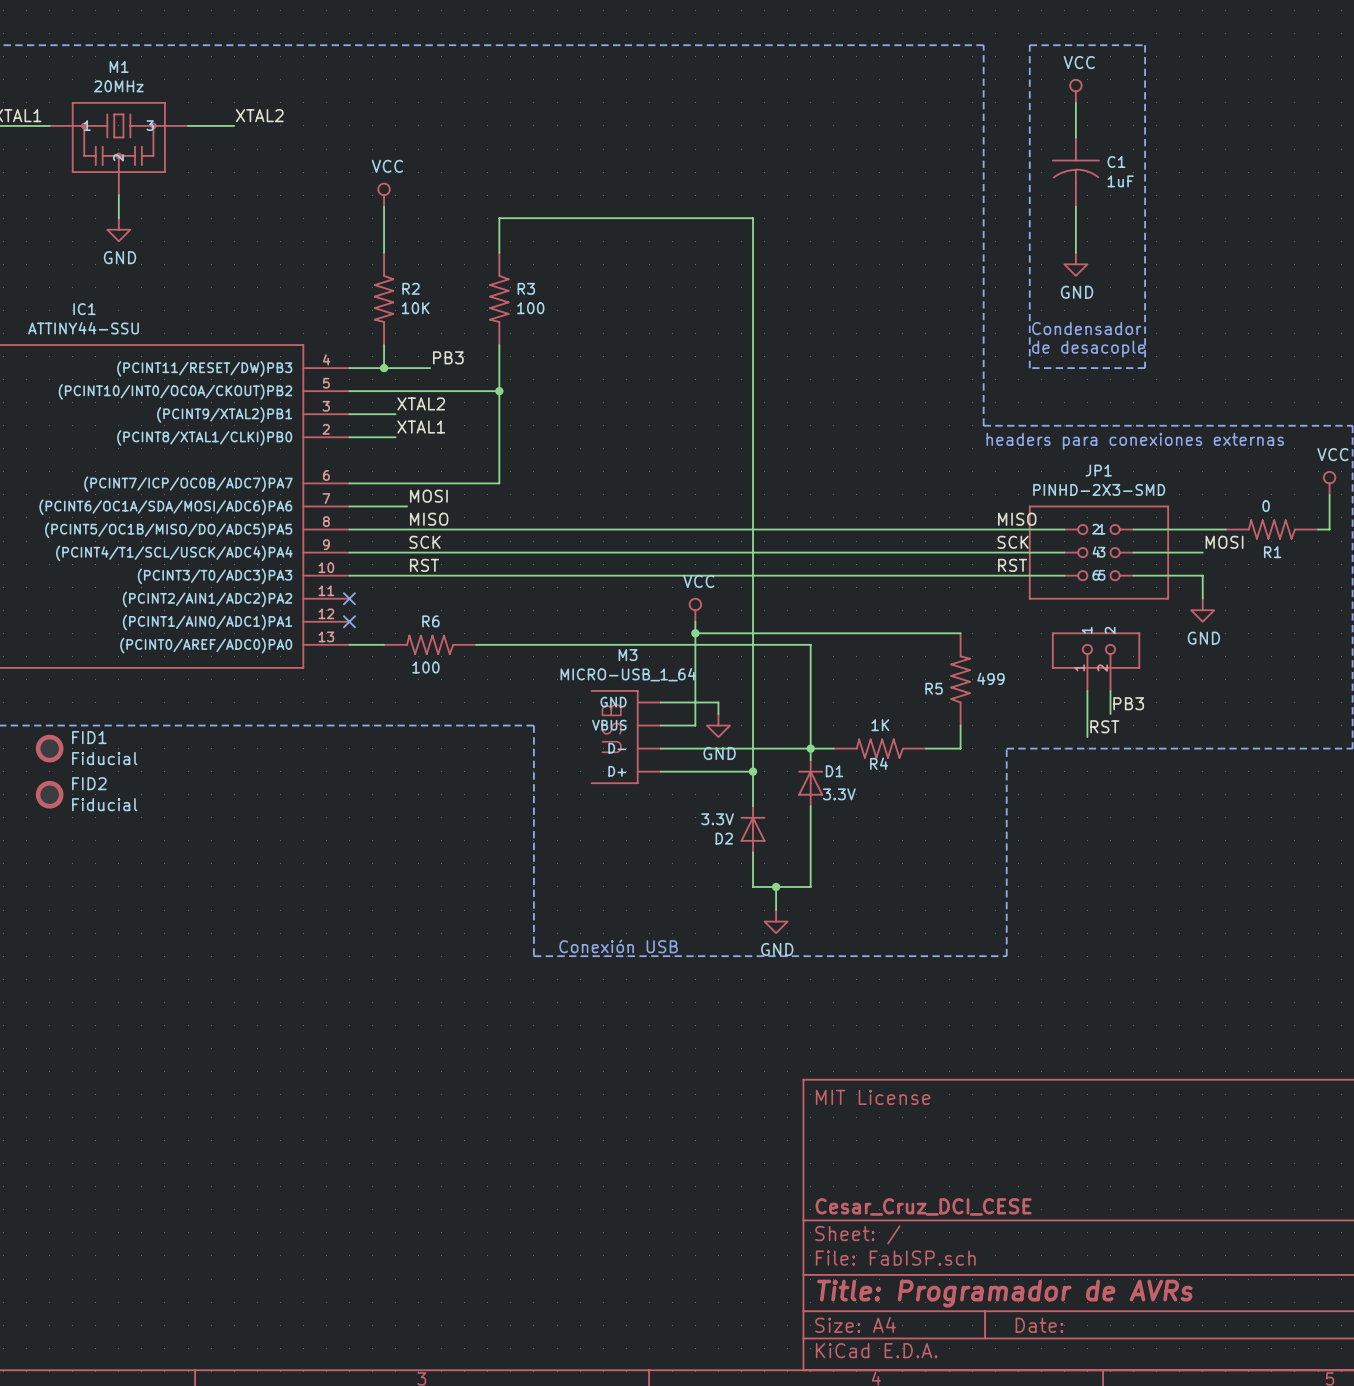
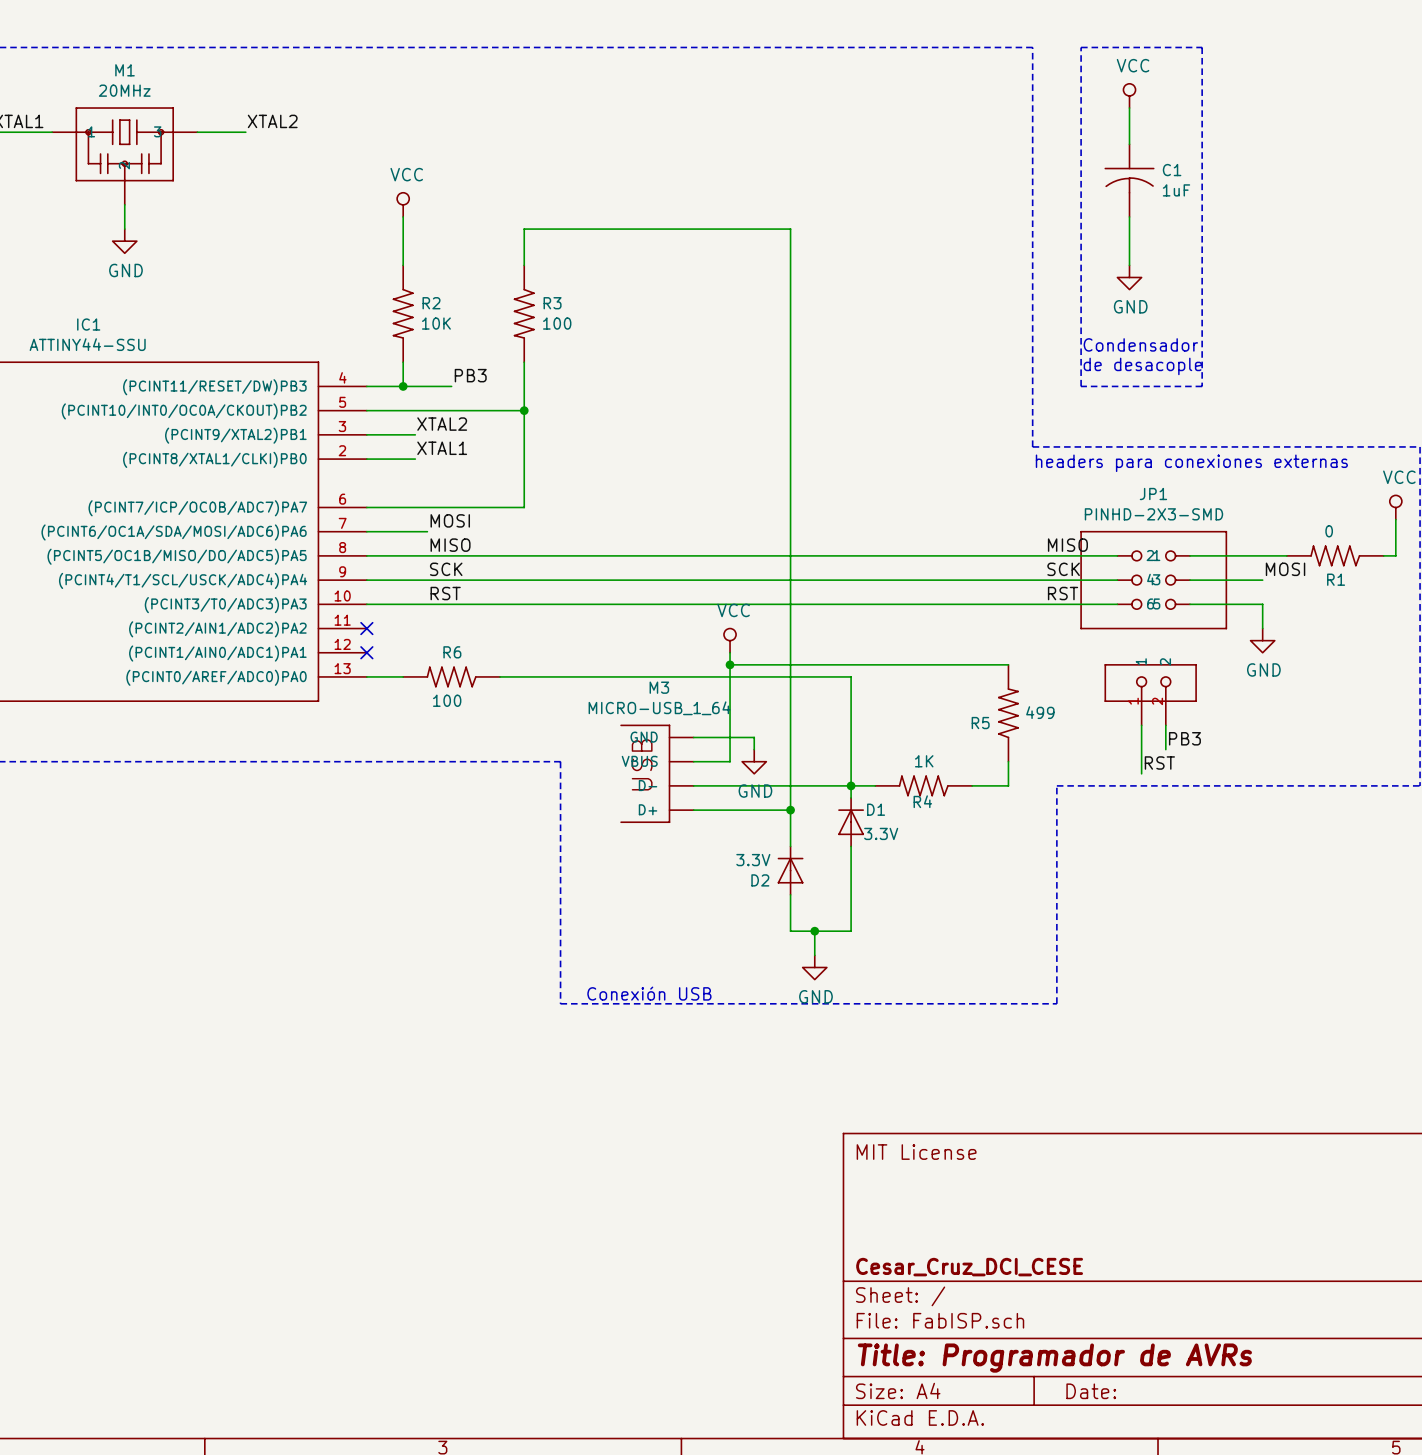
FID1: Fiducial (49, 748) -> none
FID2: Fiducial (49, 794) -> none

